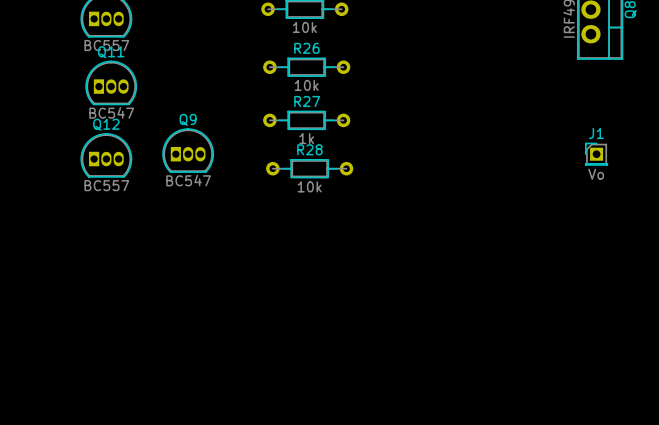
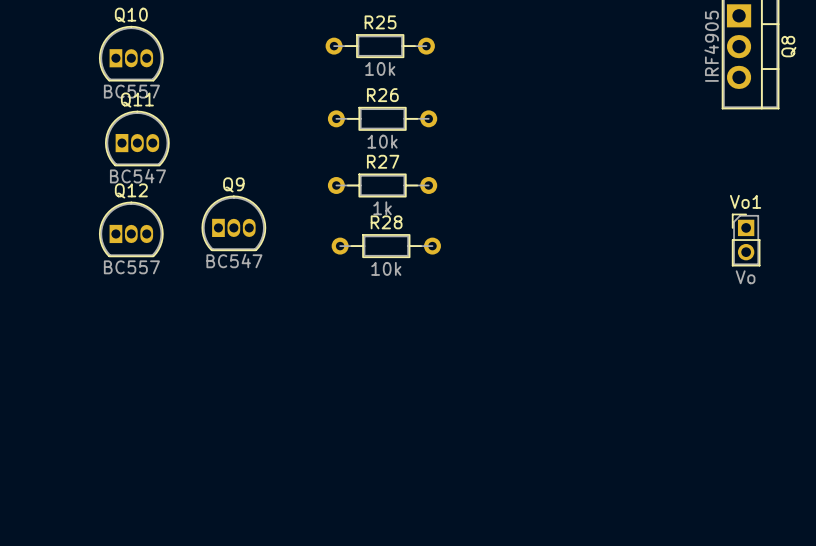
J1: Vo (596, 154) -> none
Vo1: none -> Vo (746, 240)

